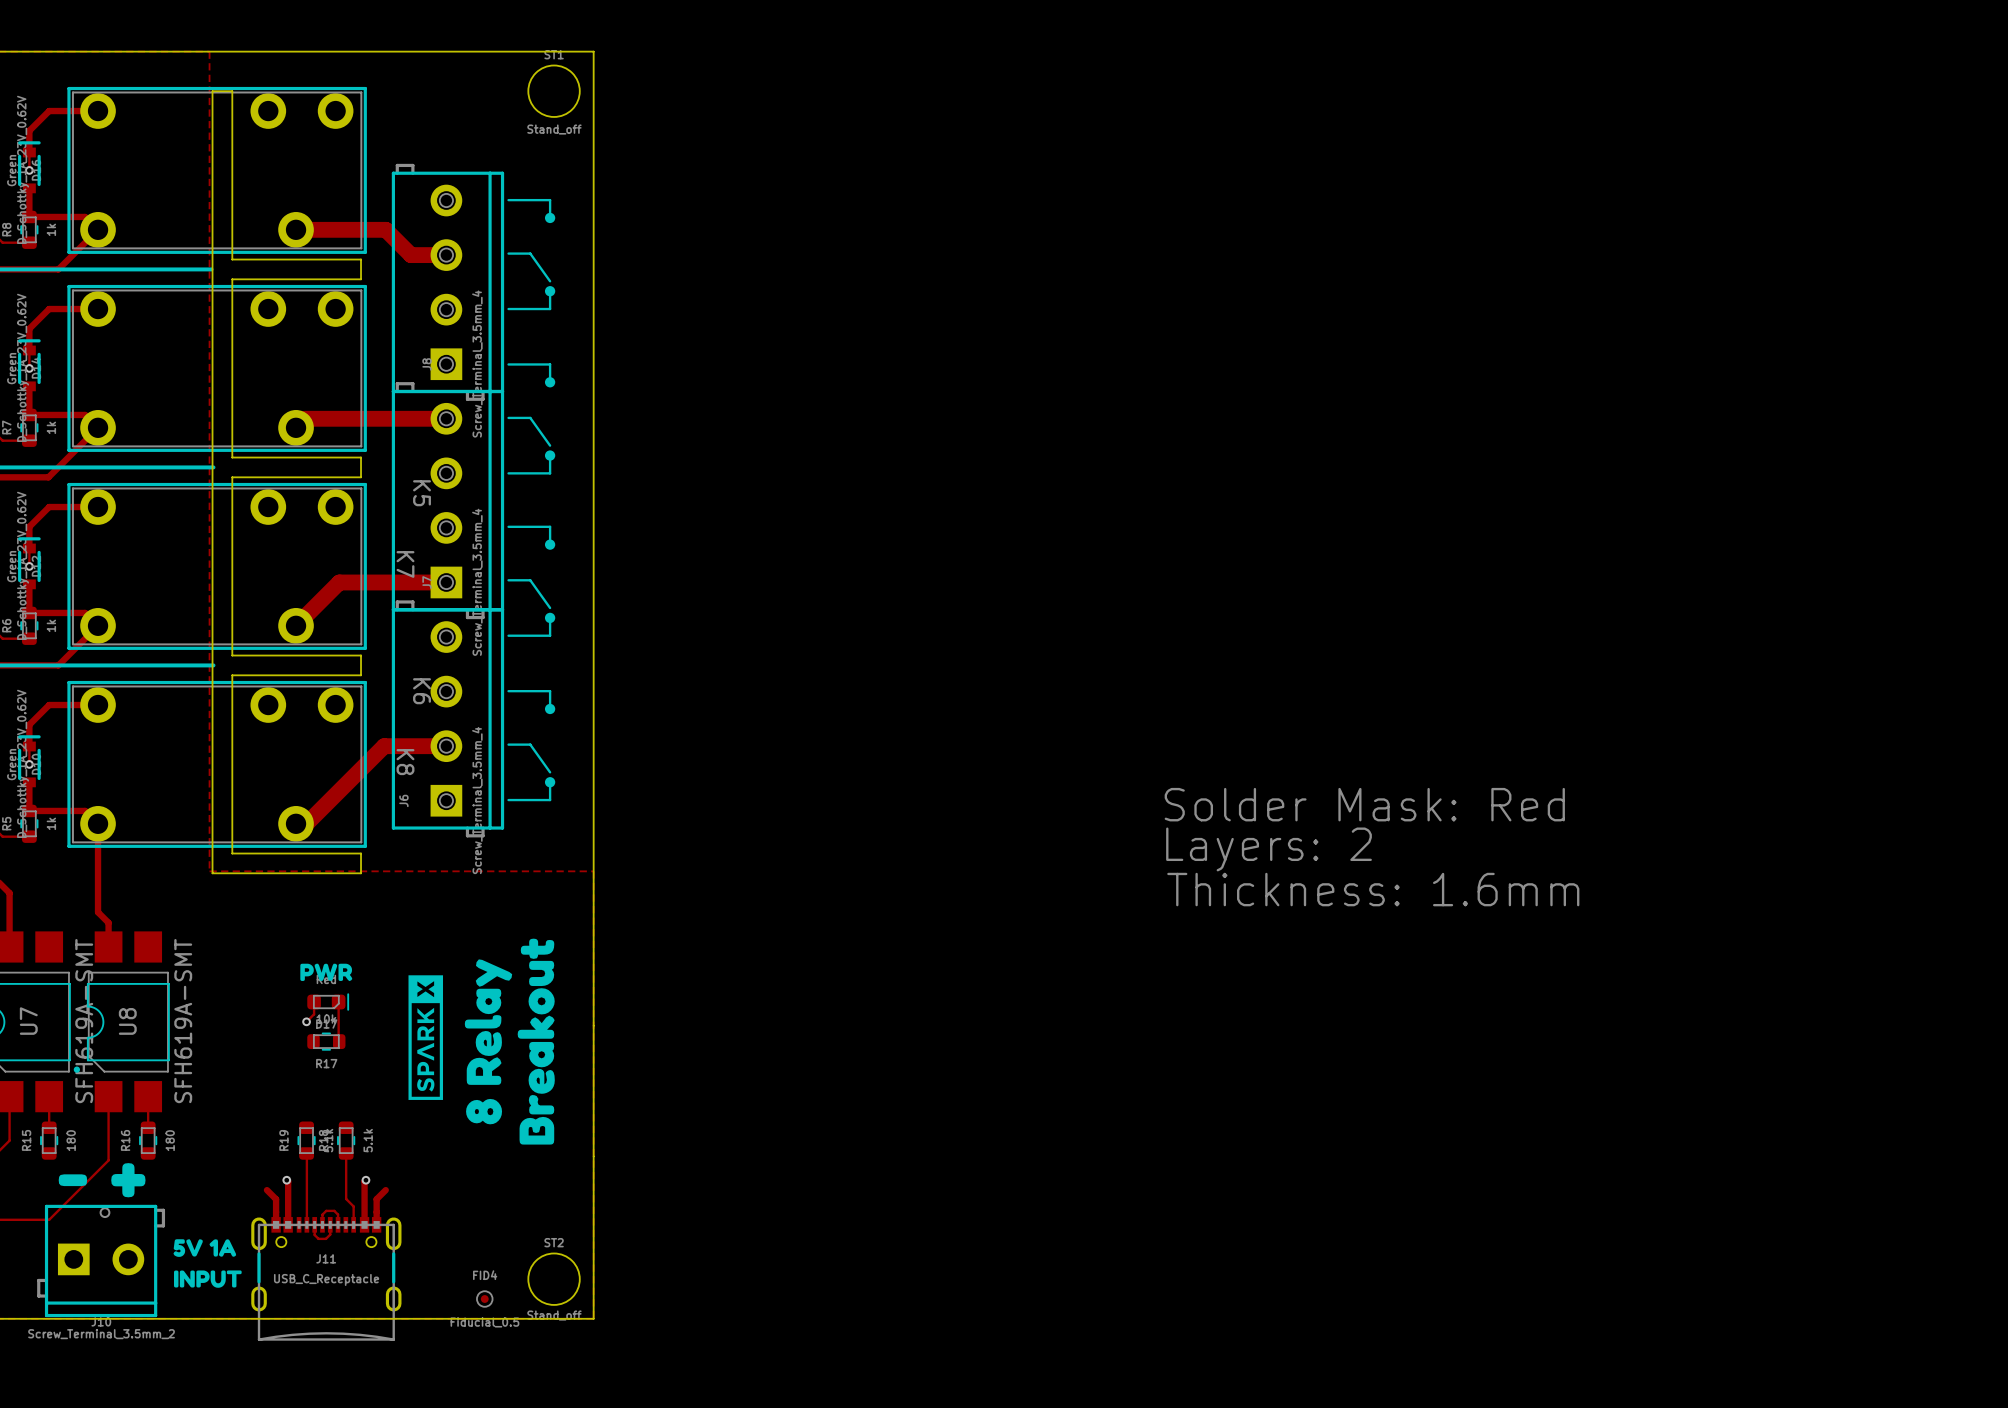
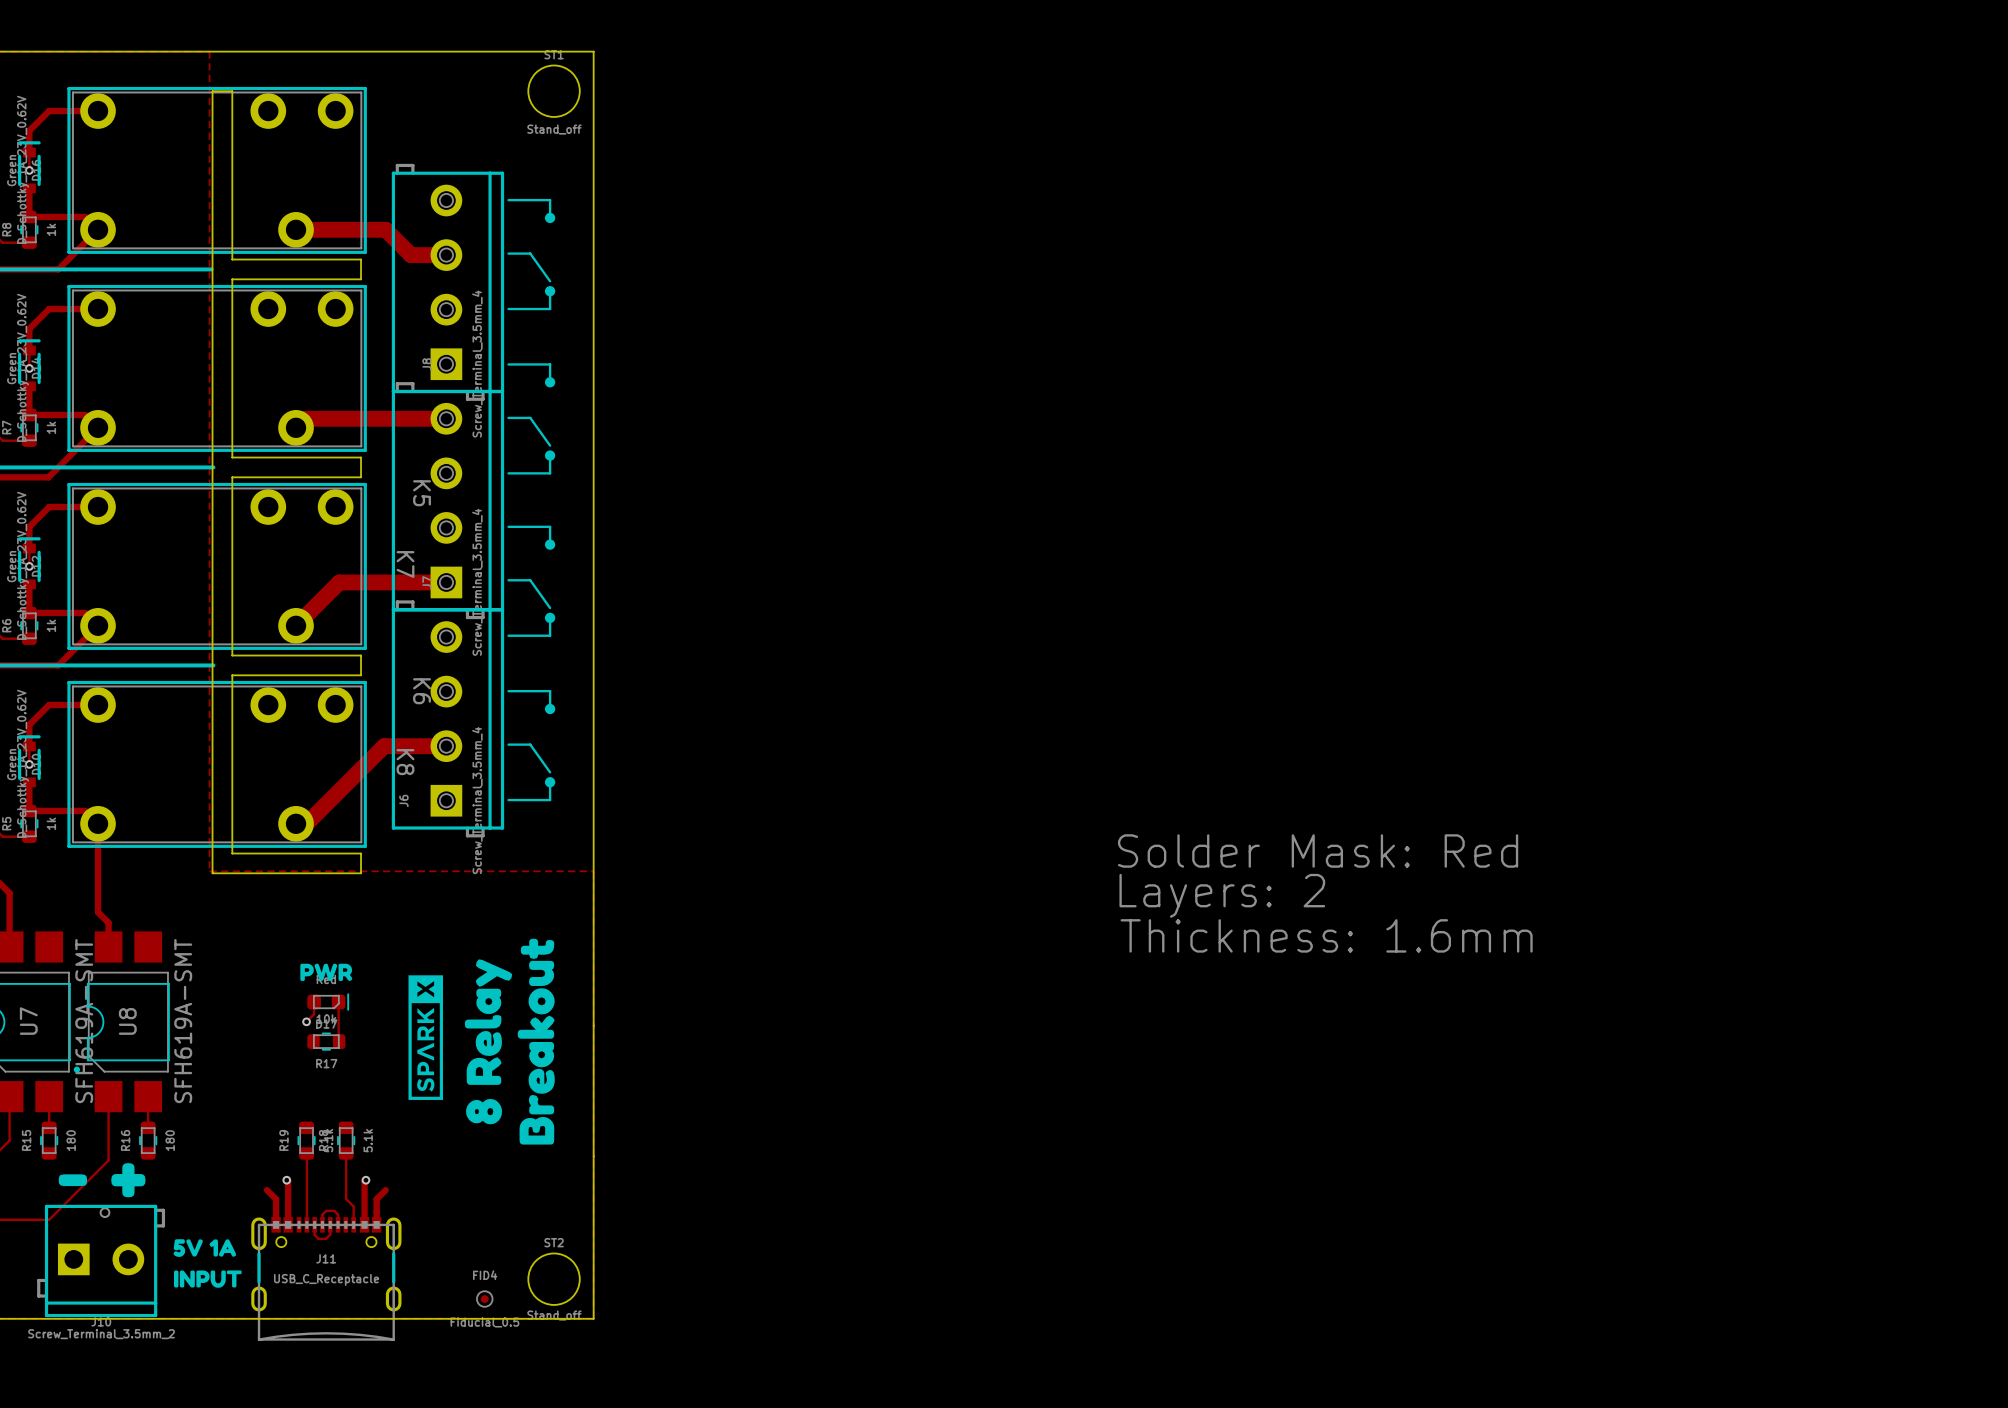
text position: Solder Mask: Red (1364, 804) -> Solder Mask: Red (1318, 851)
text position: Layers: 2 (1269, 849) -> Layers: 2 (1222, 895)
text position: Thickness: 1.6mm (1373, 889) -> Thickness: 1.6mm (1326, 935)

